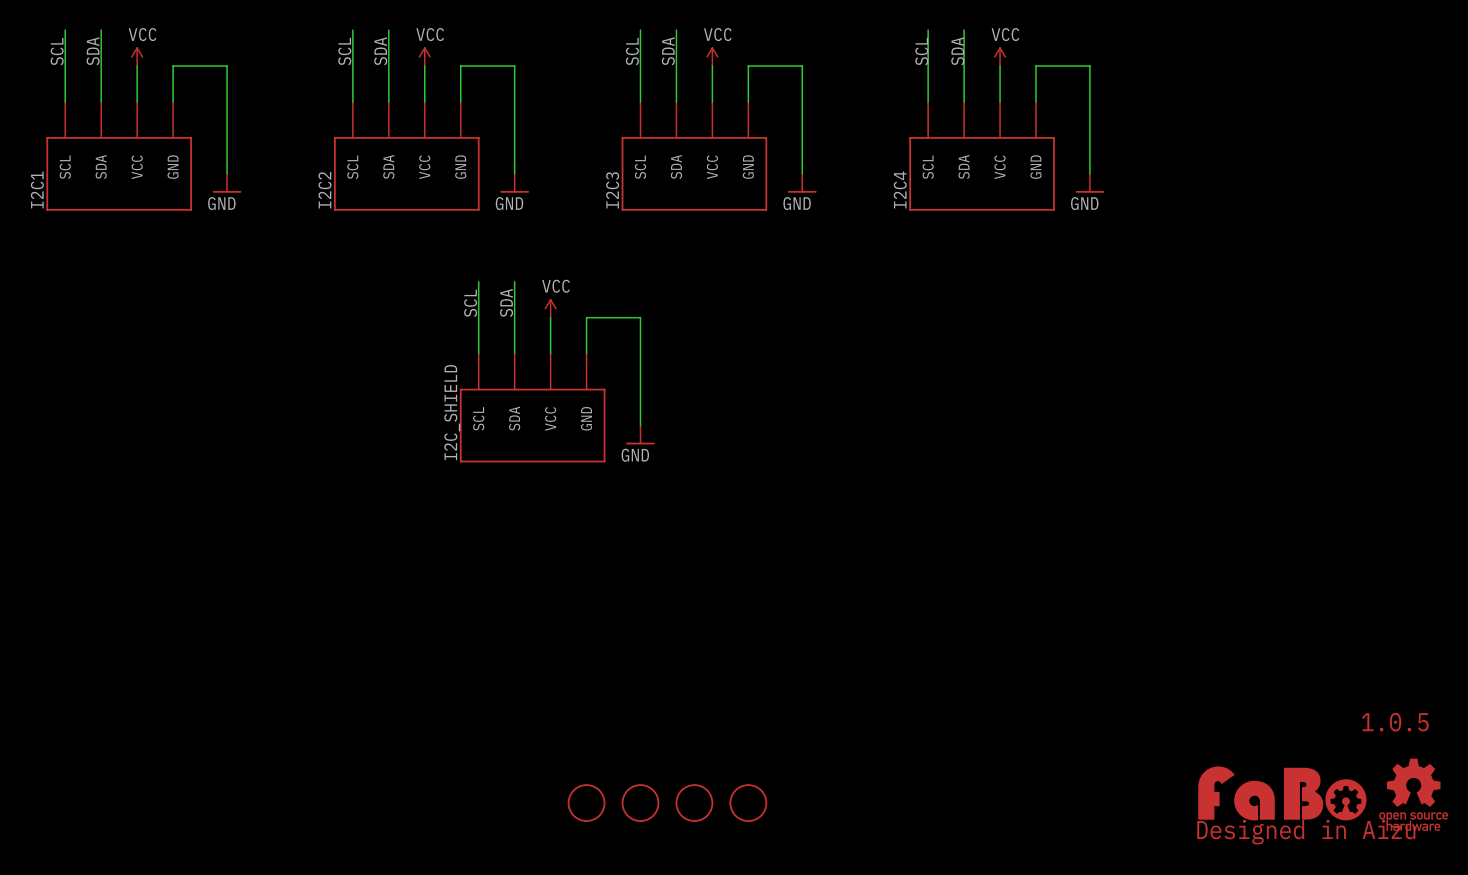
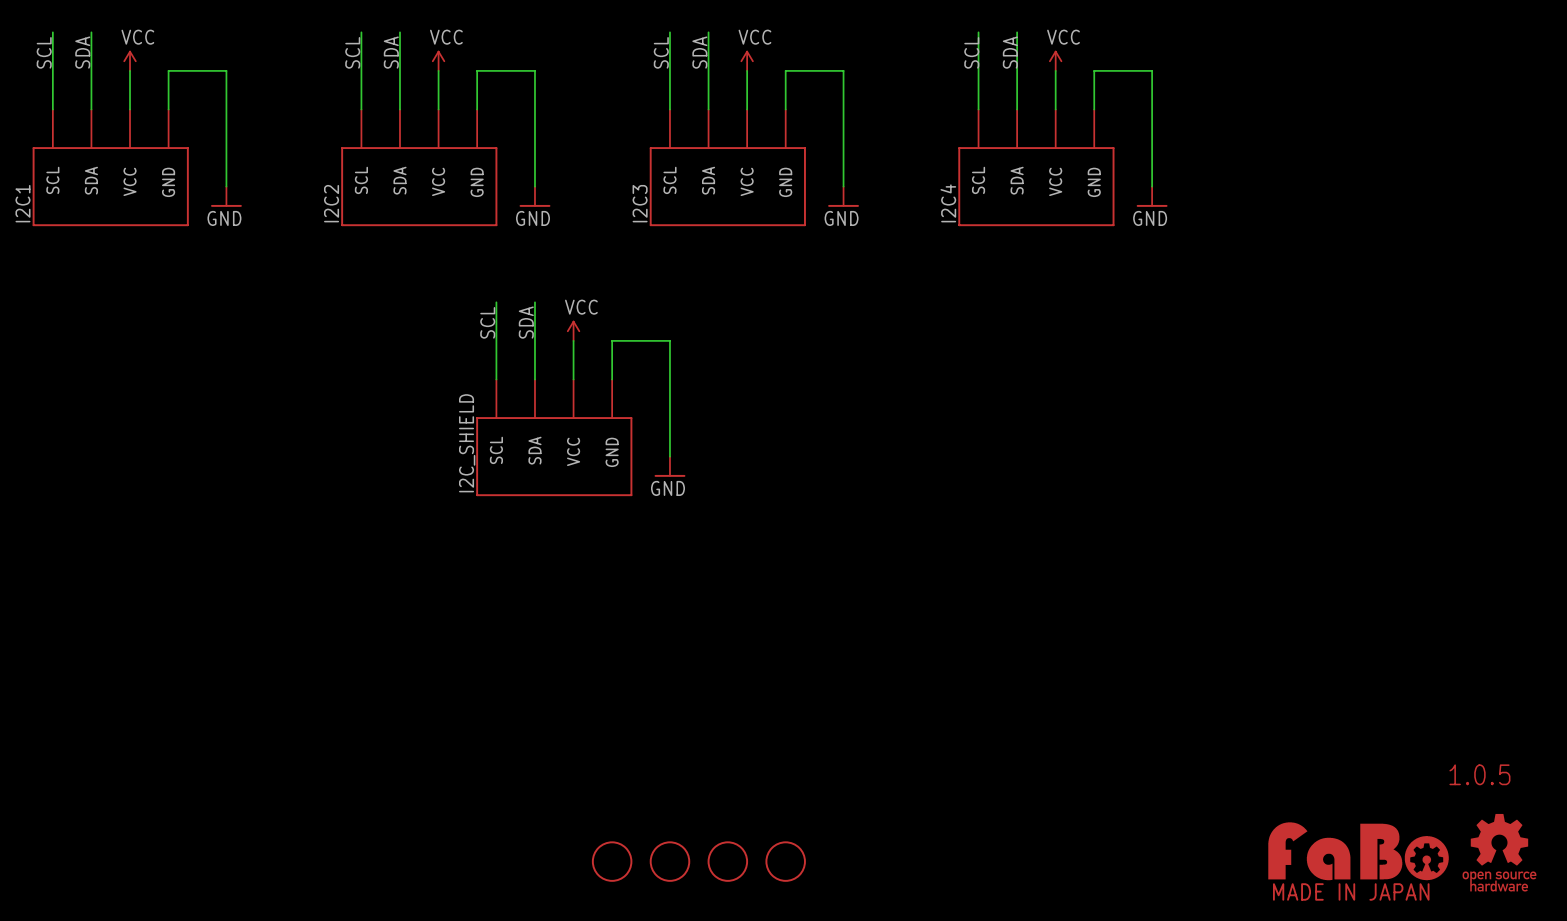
part text: none -> MADE IN JAPAN (1351, 891)
part text: Designed in Aizu (1306, 832) -> none

